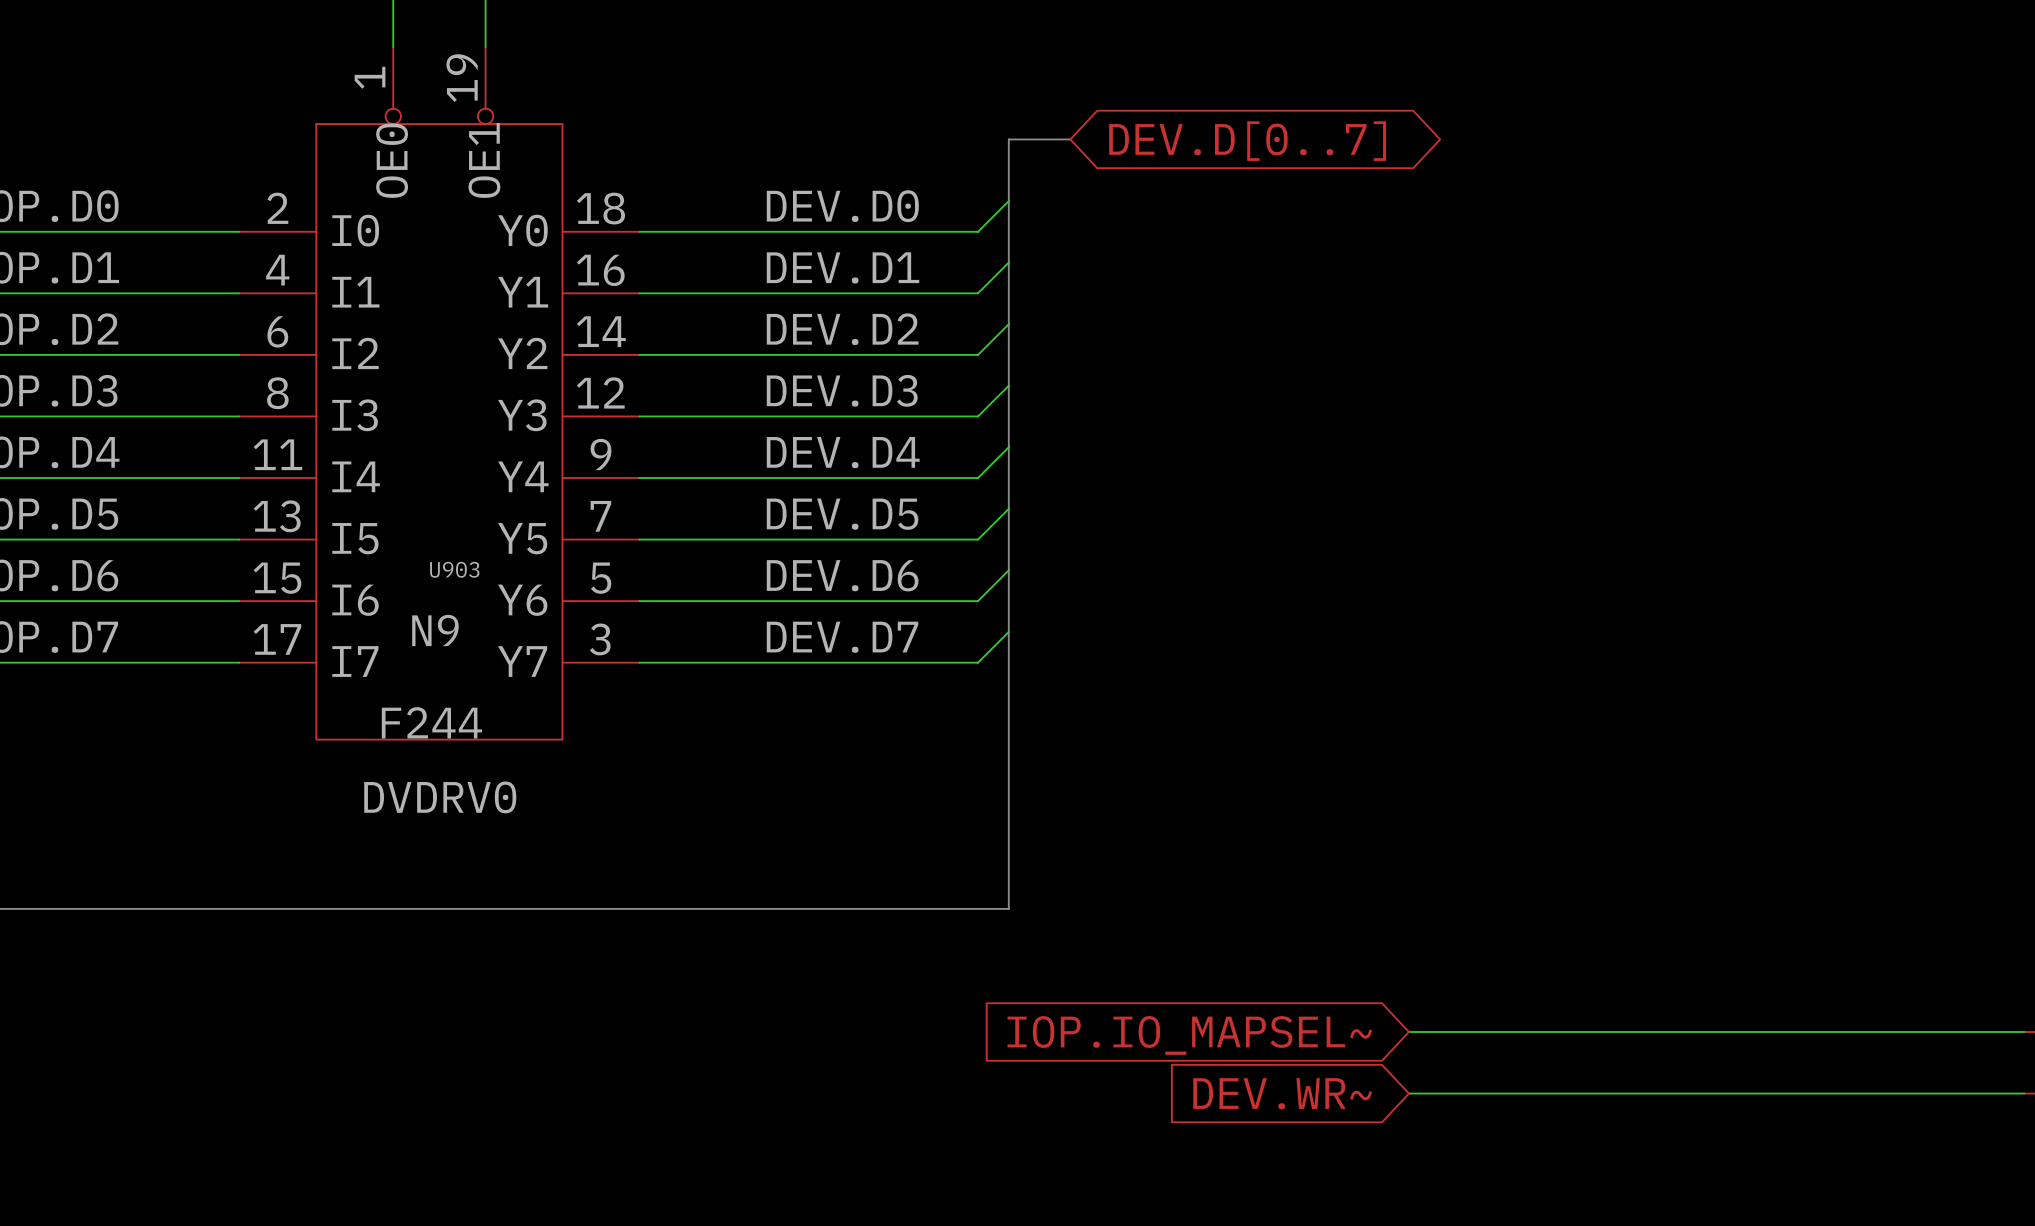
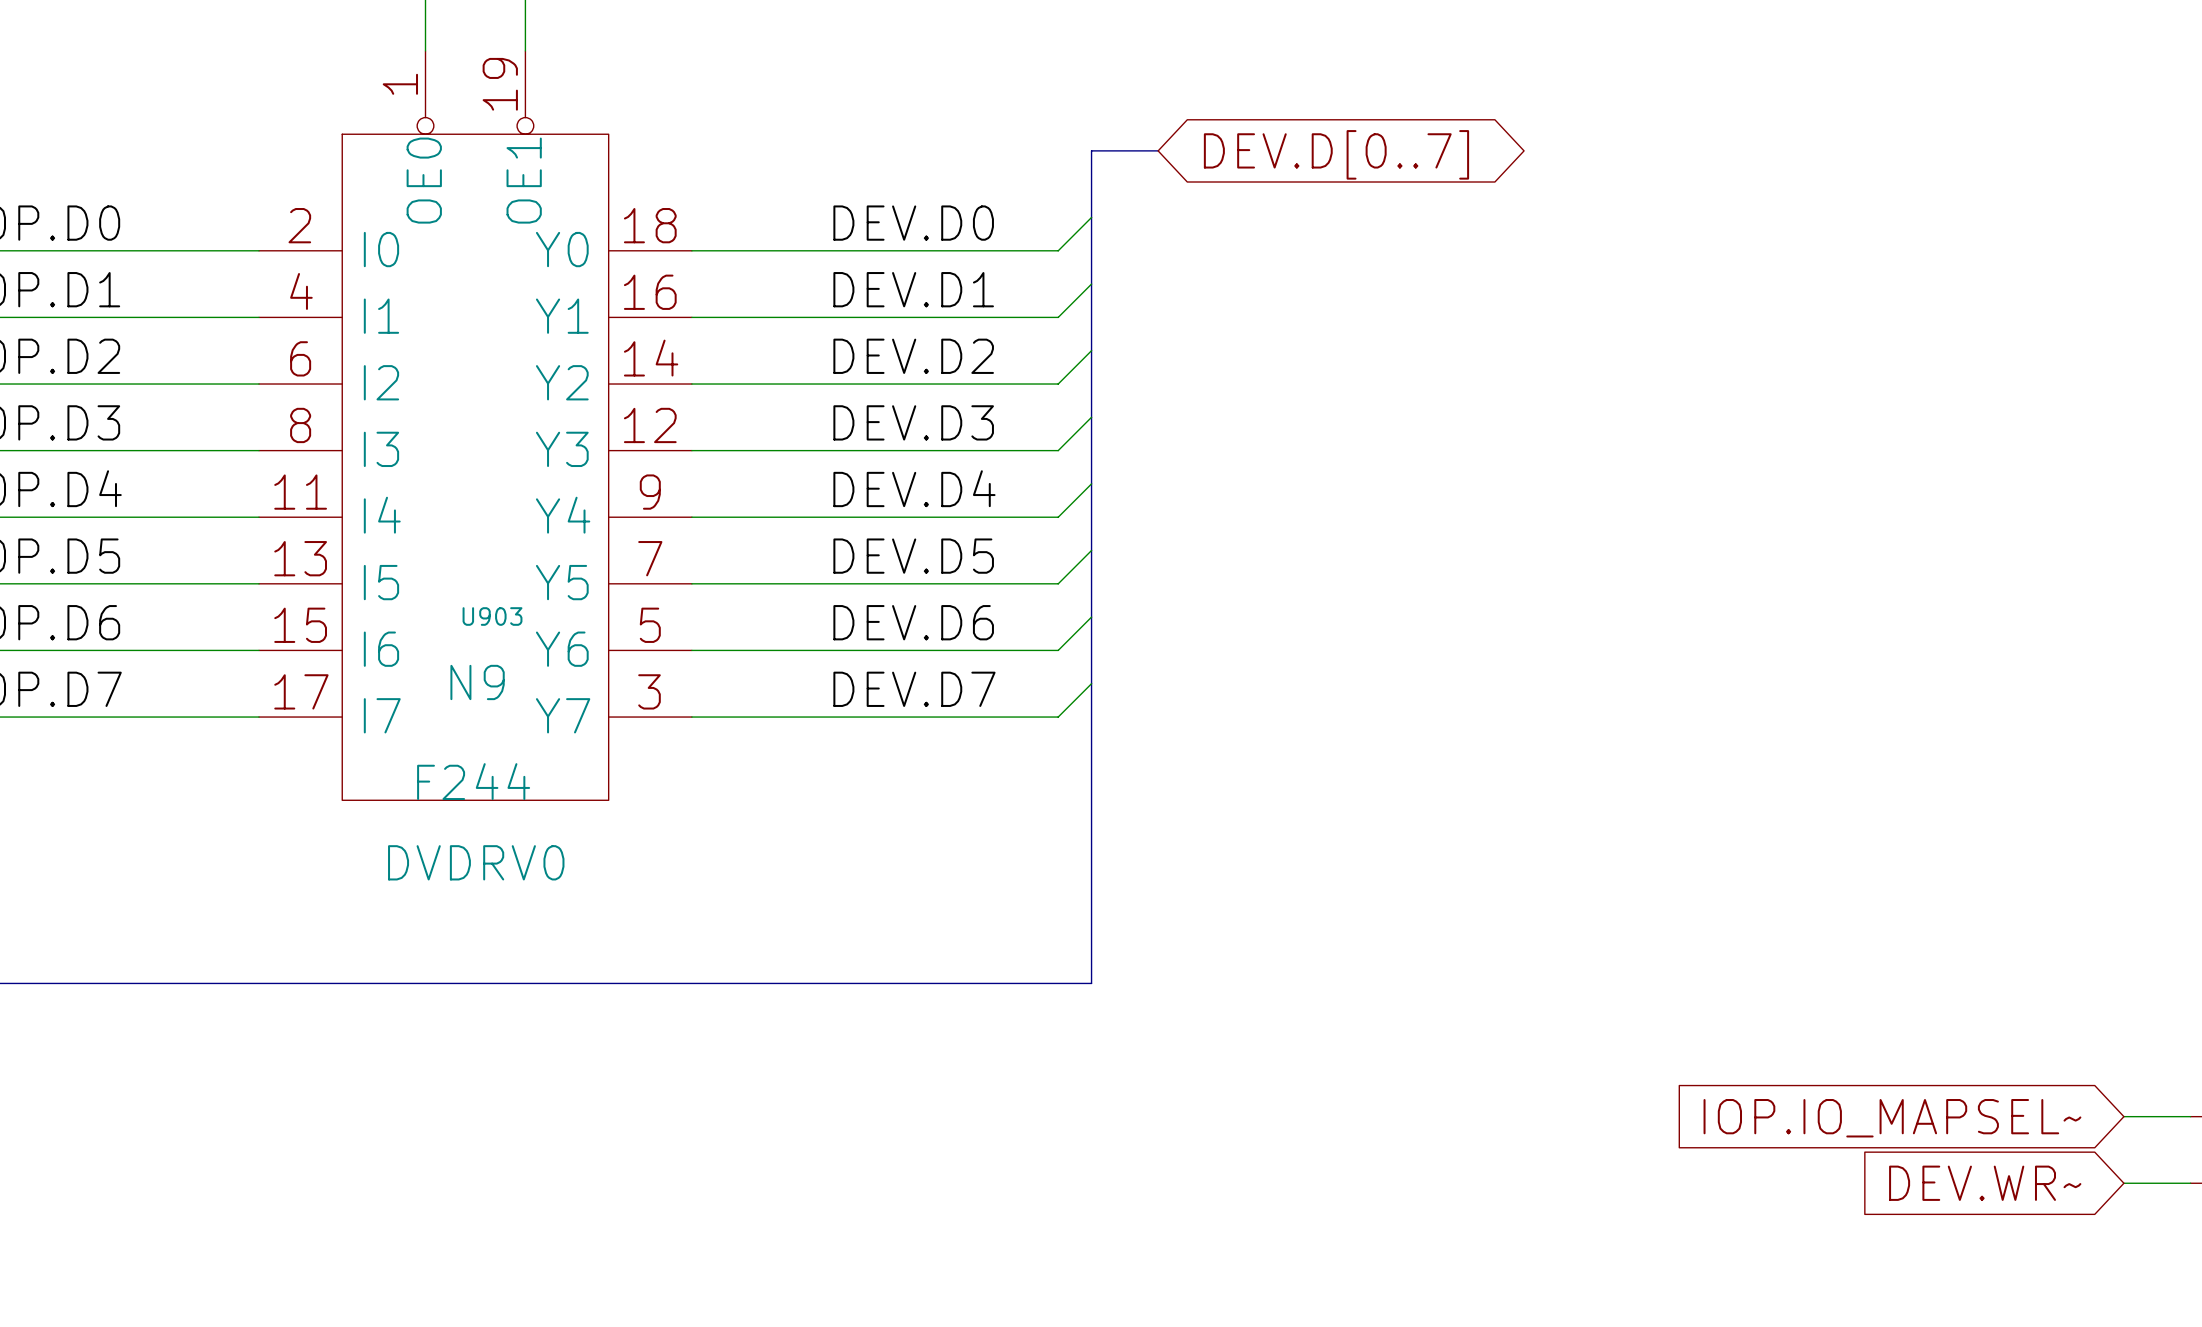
wire: (1408, 1032) (1962, 1032) -> none
global label: IOP.IO_MAPSEL~ (1189, 1035) -> none
global label: none -> IOP.IO_MAPSEL~ (1892, 1118)
global label: DEV.WR~ (1282, 1093) -> none
wire: (1408, 1093) (1962, 1093) -> none
global label: none -> DEV.WR~ (1985, 1183)

